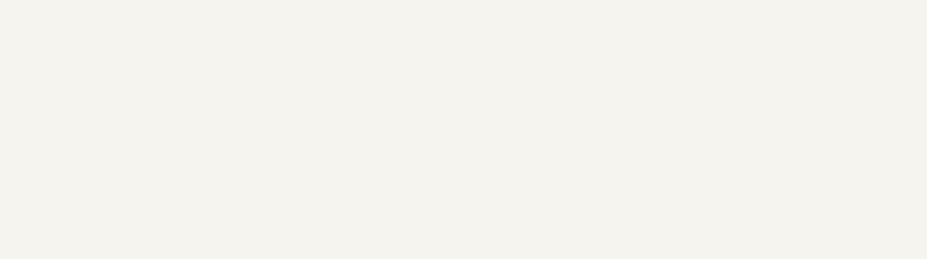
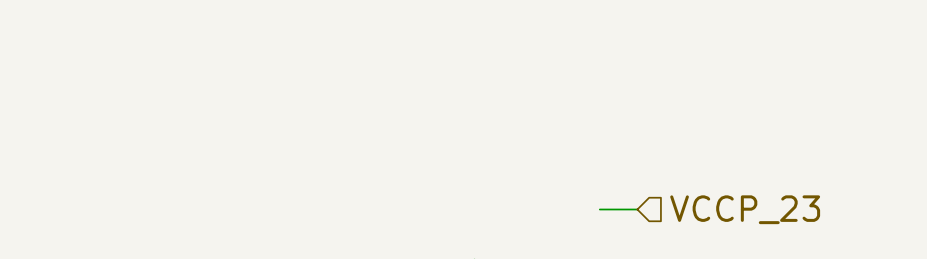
wire: none -> (599, 209) (637, 209)
hierarchical label: none -> VCCP_23 (745, 209)

